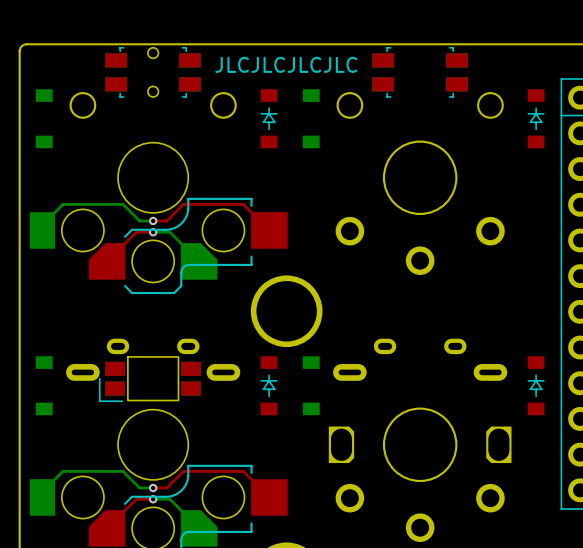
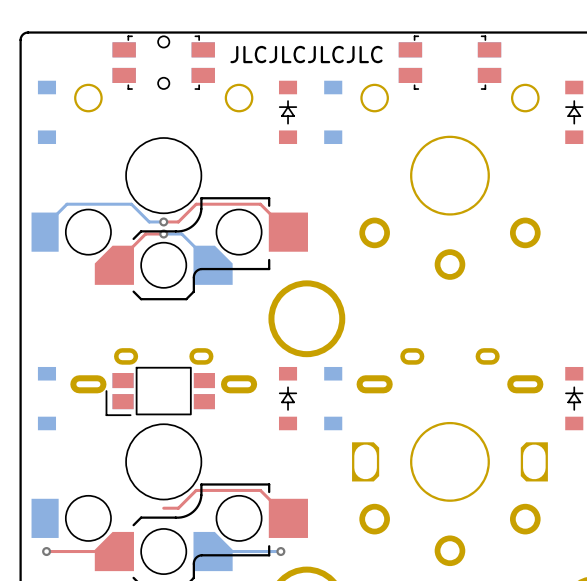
bottom track: (153, 487) (139, 487) (123, 471) (62, 471) (36, 497) -> none
via: (153, 487) -> none
top track: (153, 499) (136, 499) (107, 528) -> (46, 551) (114, 551)
bottom track: (153, 499) (170, 499) (199, 528) -> (280, 551) (213, 551)
via: (153, 499) -> none
via: none -> (46, 551)
via: none -> (280, 551)

